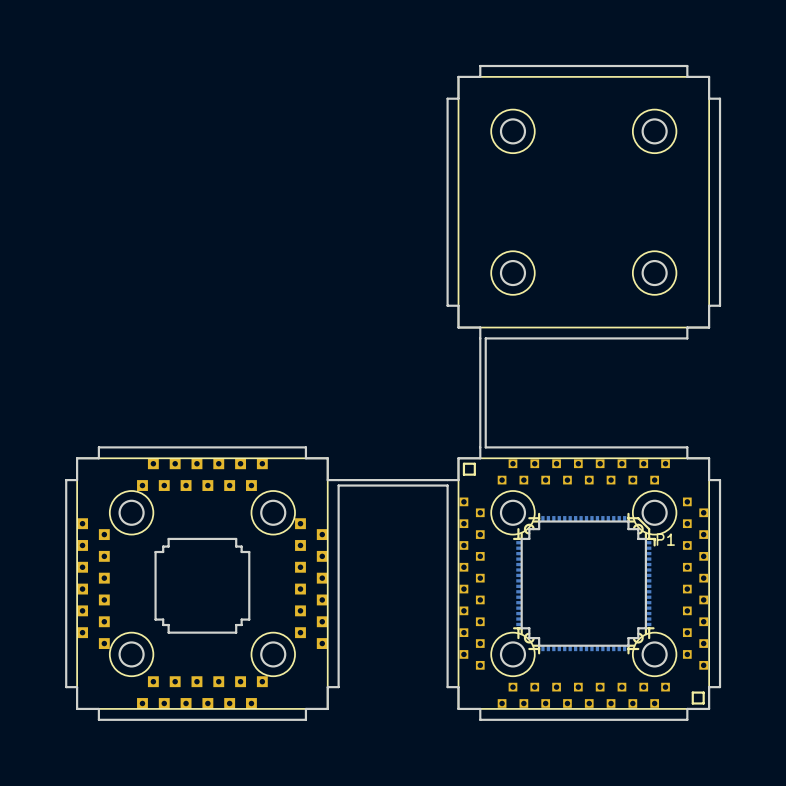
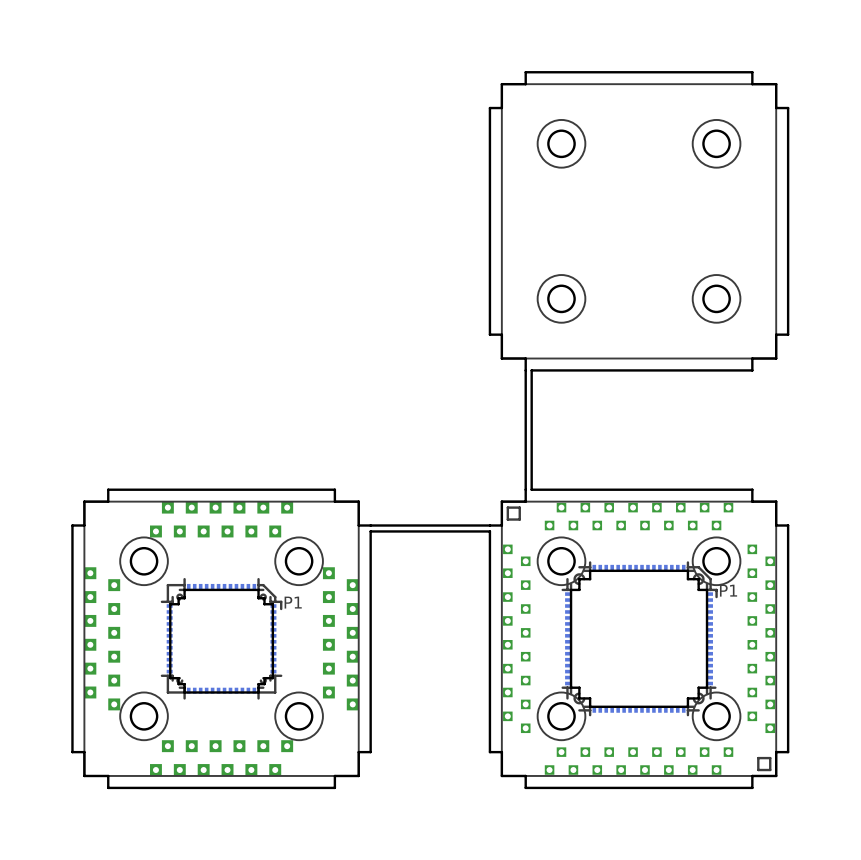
text: none -> P1 (293, 602)
part: none -> (221, 638)

